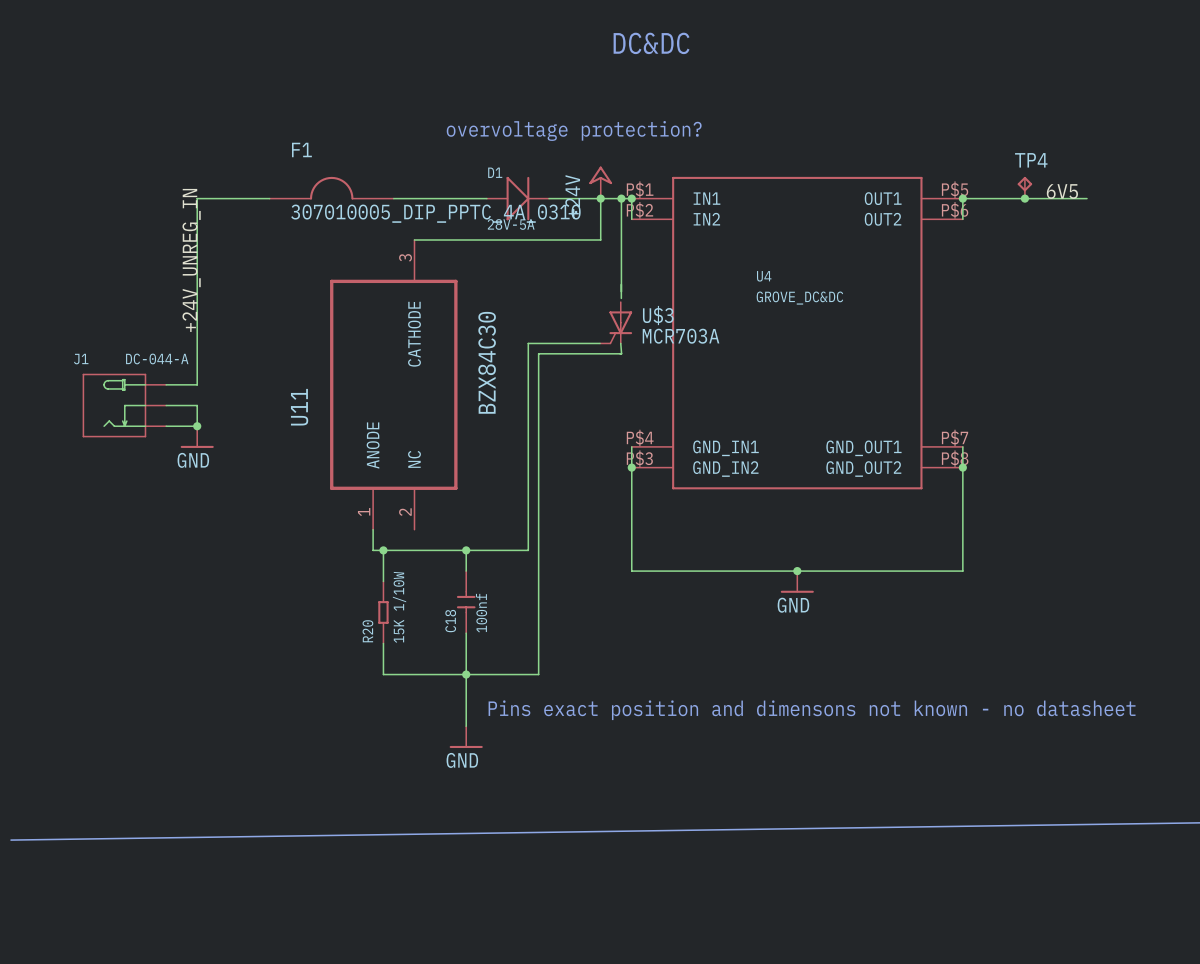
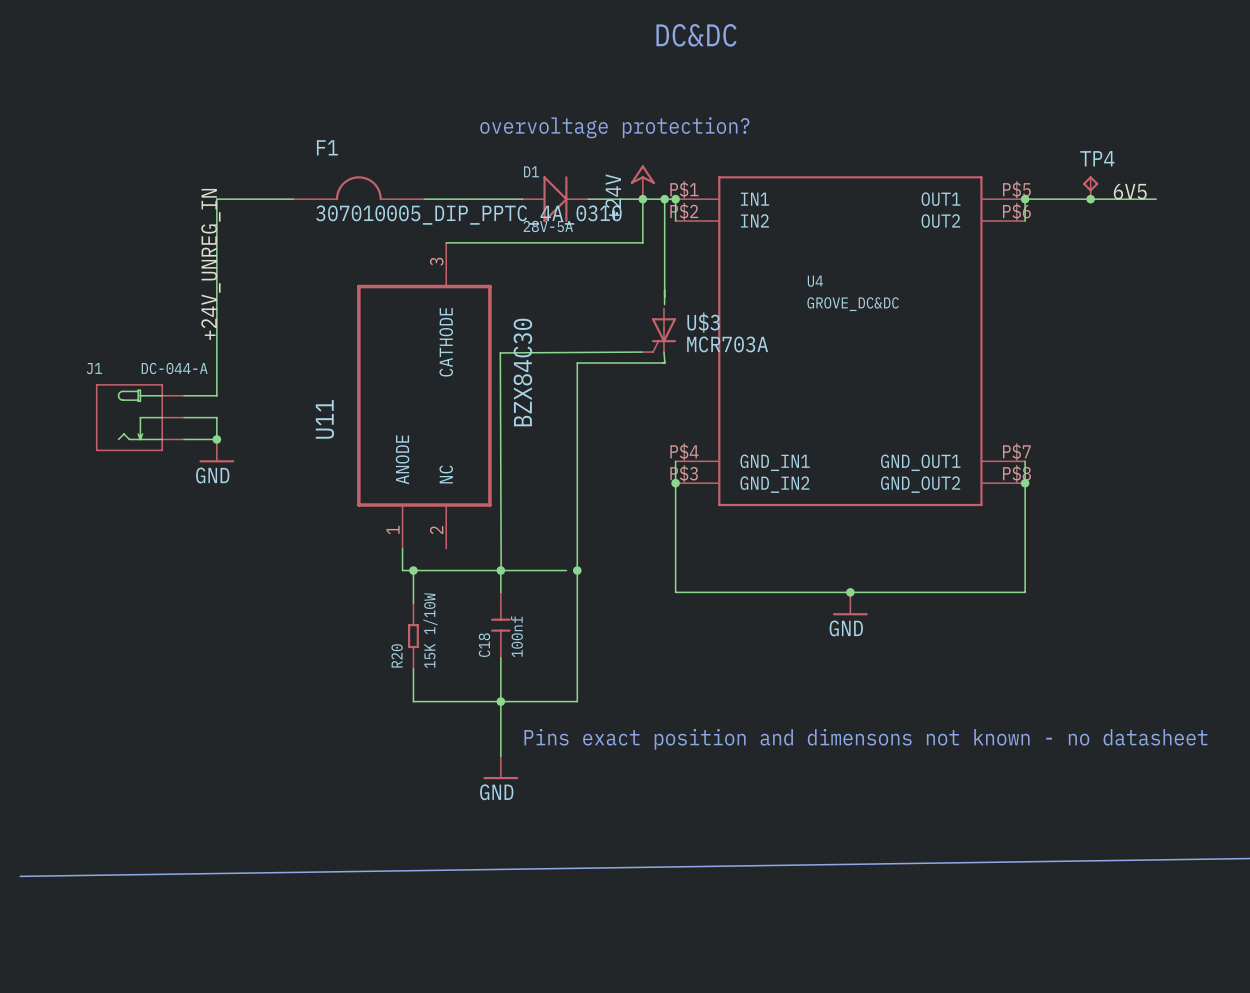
wire: (600, 343) (528, 343) (528, 550) -> (642, 352) (500, 352) (501, 571)
junction: none -> (577, 570)

